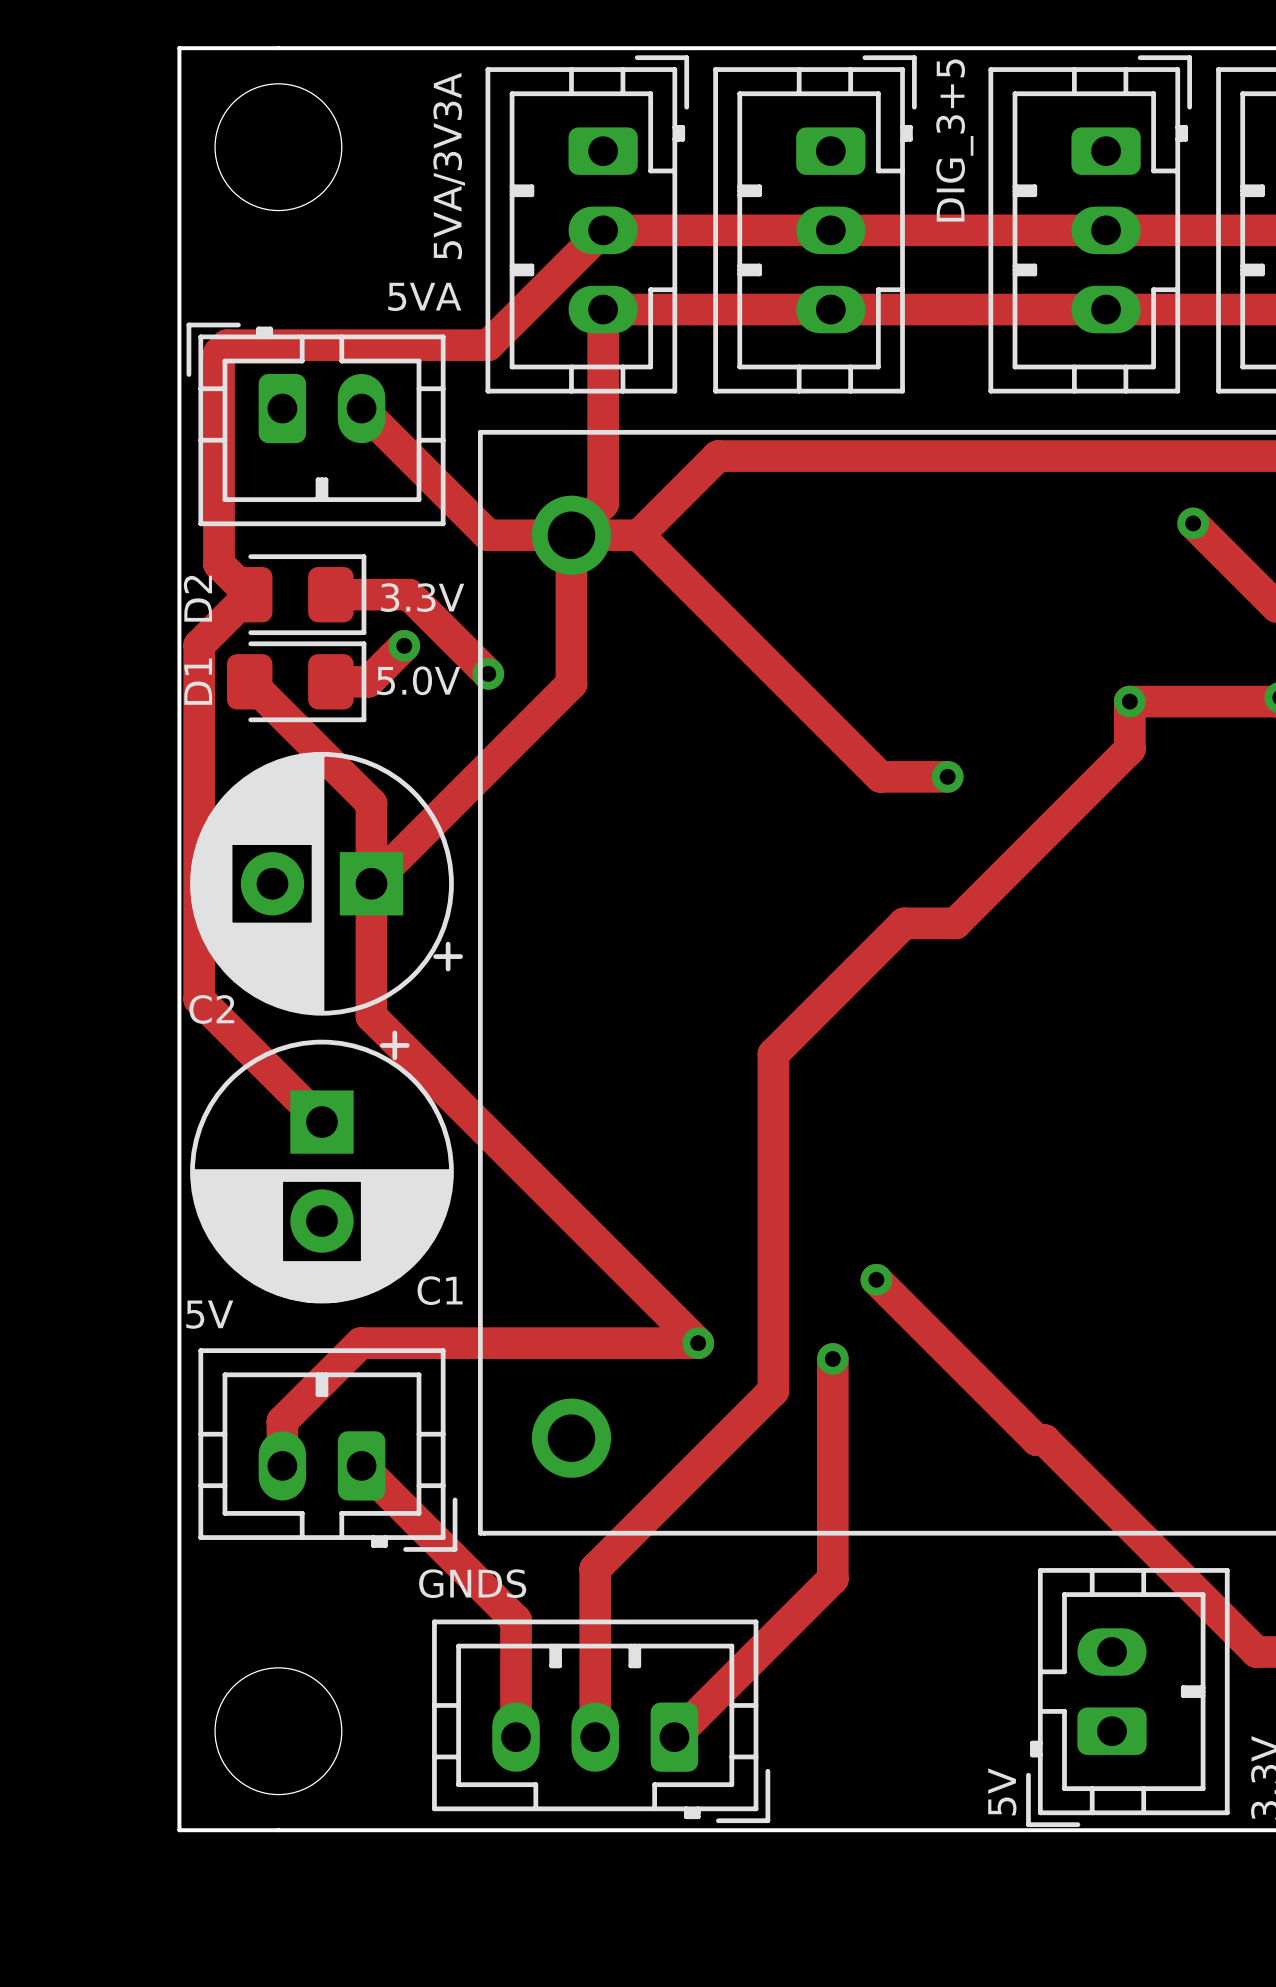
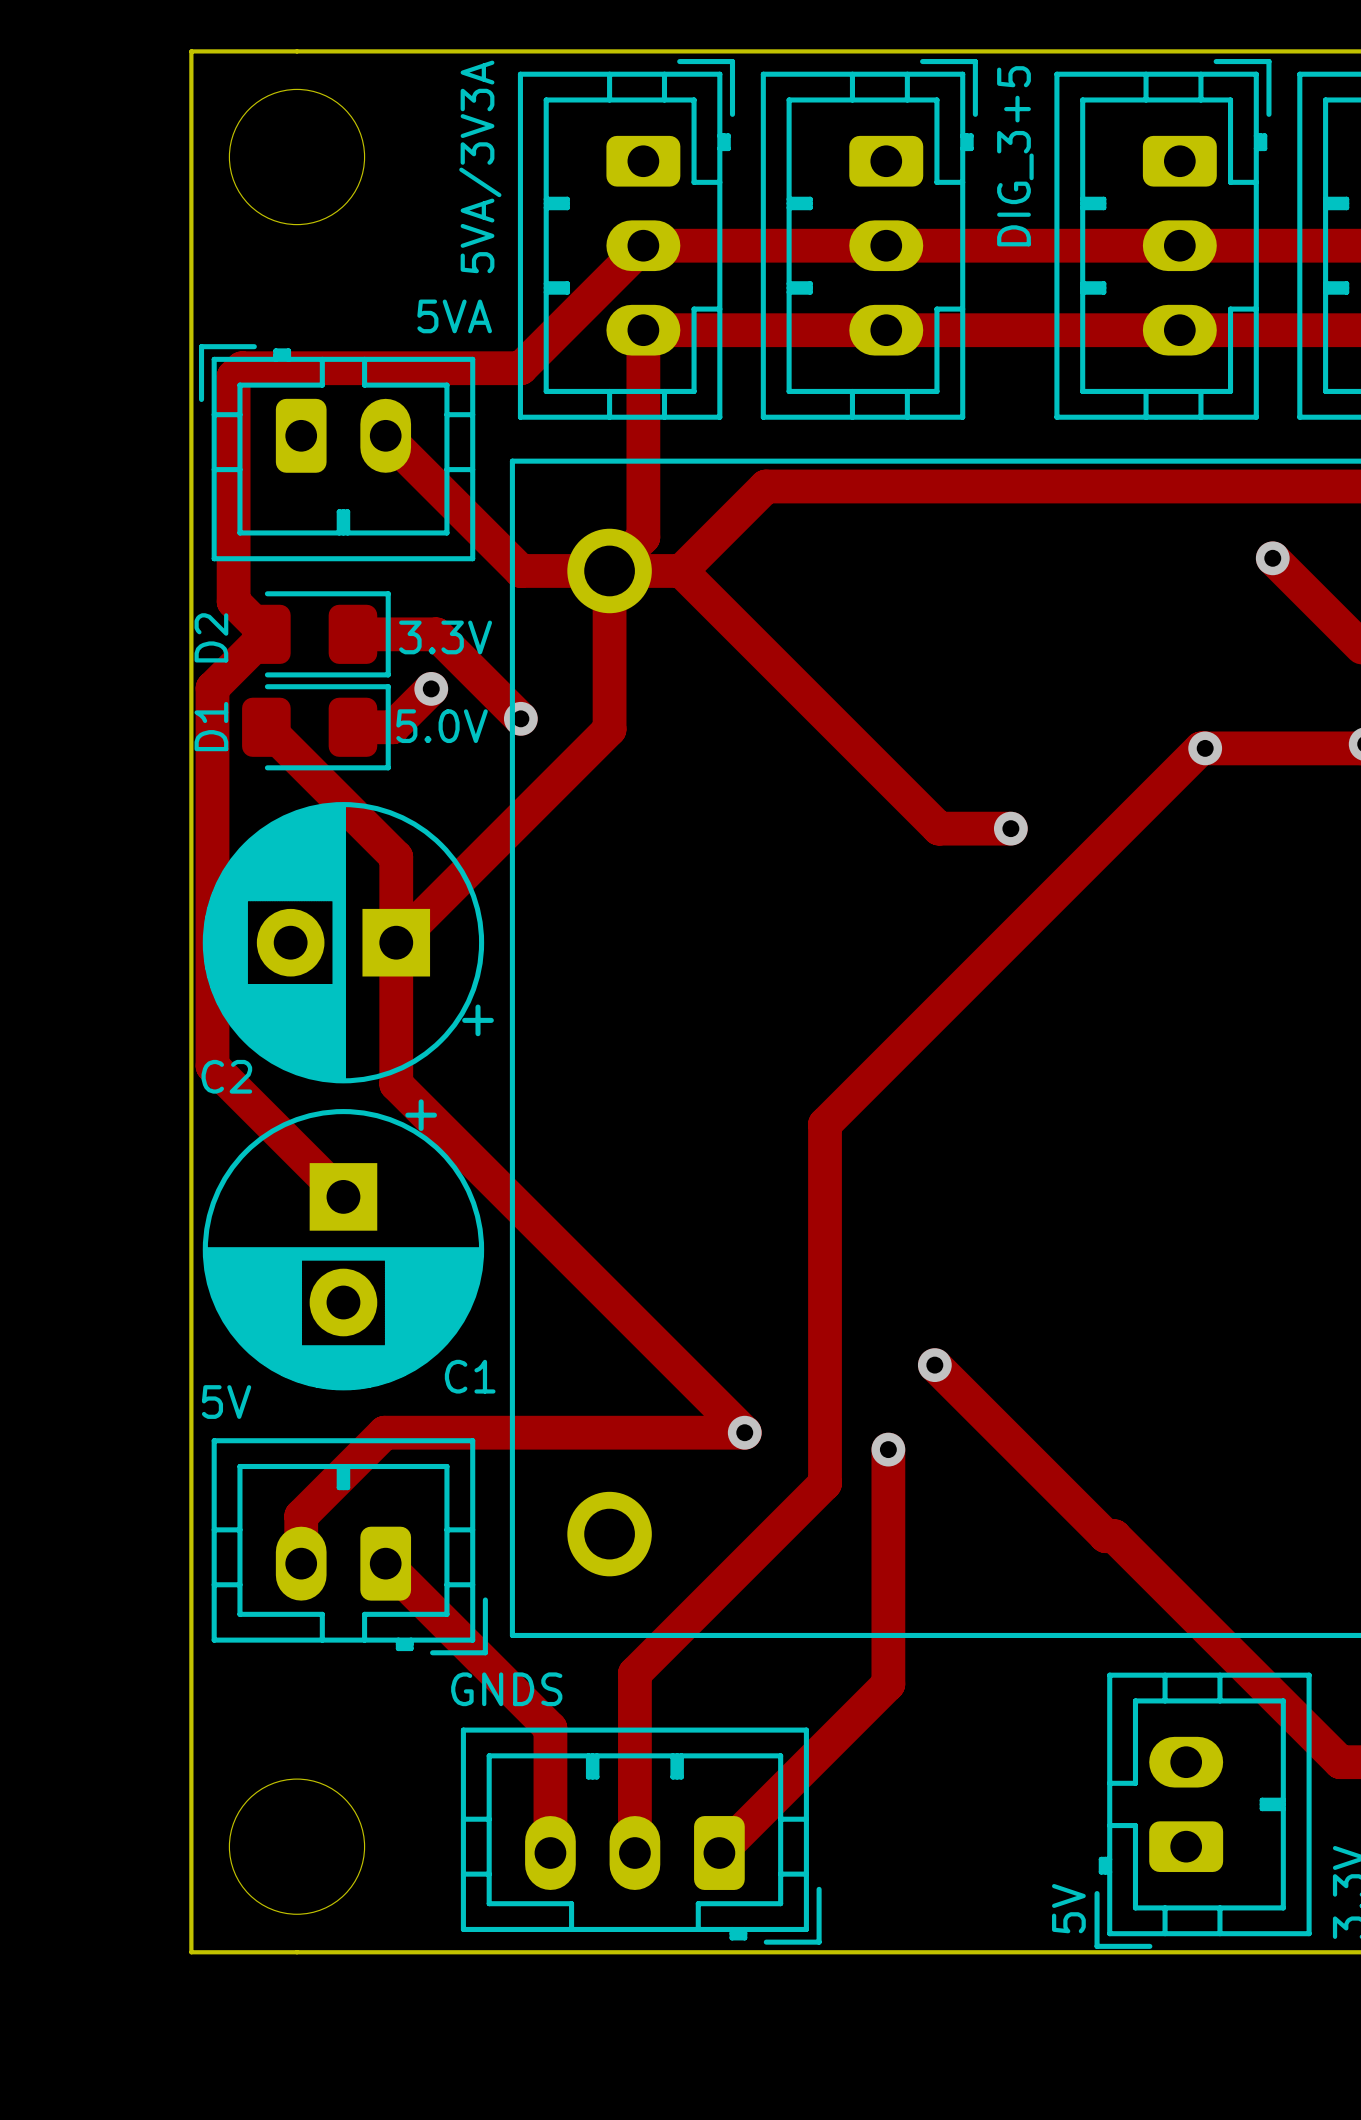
track: (1129, 701) (1129, 749) (955, 923) (904, 923) -> (1205, 748) (1200, 748) (964, 984)

